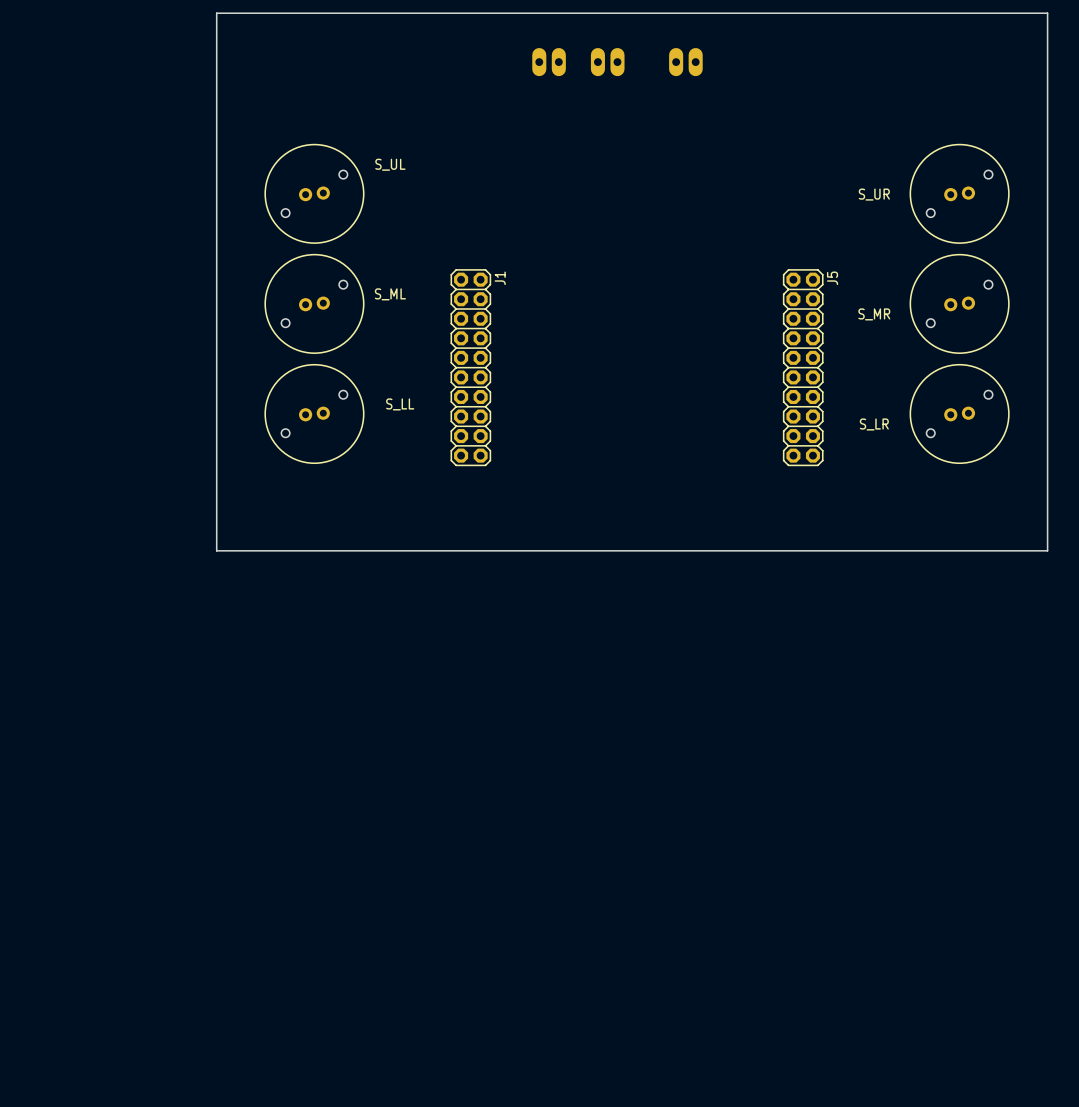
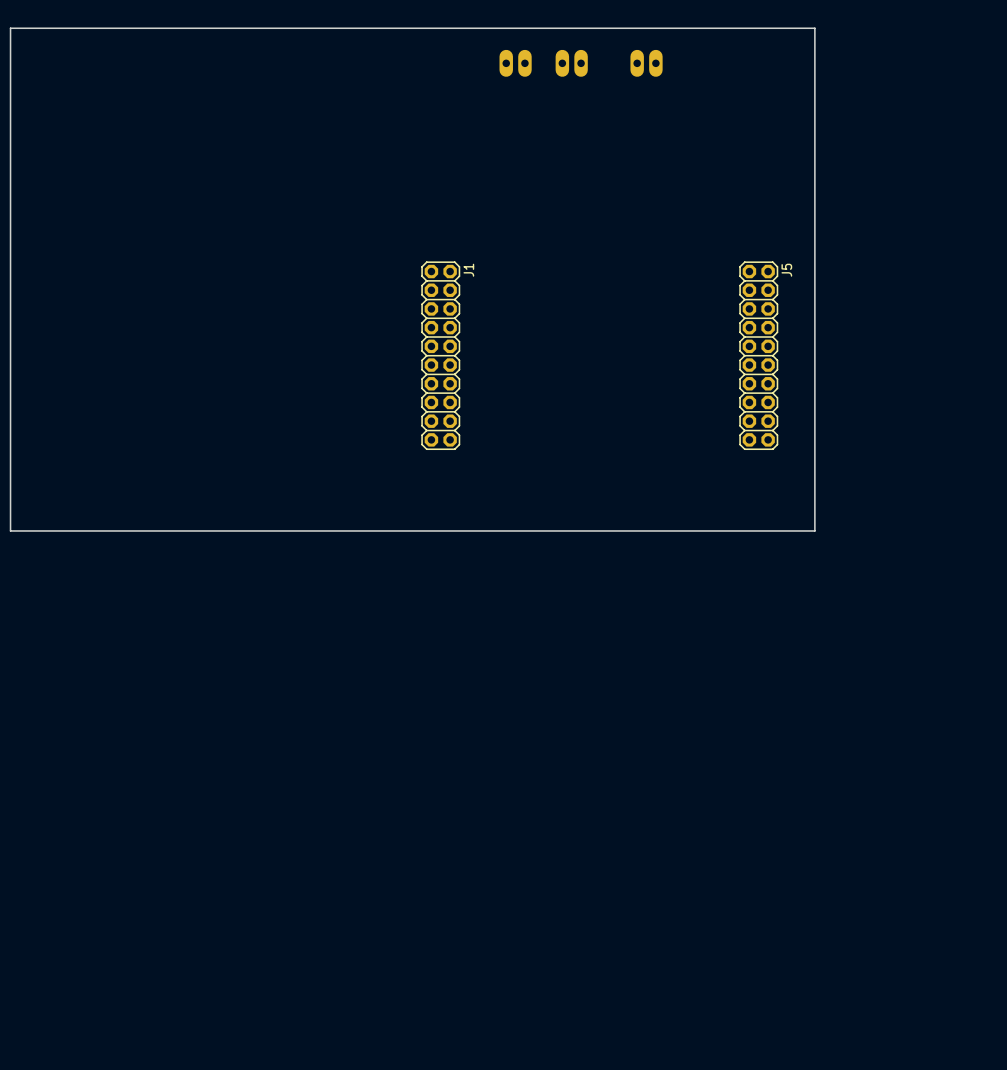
S_UL: (314, 193) -> none
S_UR: (959, 193) -> none
S_ML: (314, 303) -> none
S_MR: (959, 303) -> none
S_LL: (314, 413) -> none
S_LR: (959, 413) -> none
board edge: (216, 550) (216, 13) (1047, 13) (1047, 550) (861, 550) -> (197, 530) (10, 530) (10, 28) (814, 28) (814, 530)

